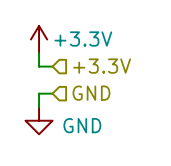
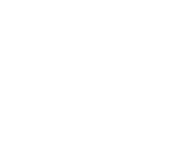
power symbol: +3.3V (39, 39) -> none
wire: (39, 53) (39, 66) (52, 66) -> none
hierarchical label: +3.3V (102, 66) -> none
wire: (52, 93) (39, 93) (39, 107) -> none
hierarchical label: GND (91, 93) -> none
power symbol: GND (39, 120) -> none

